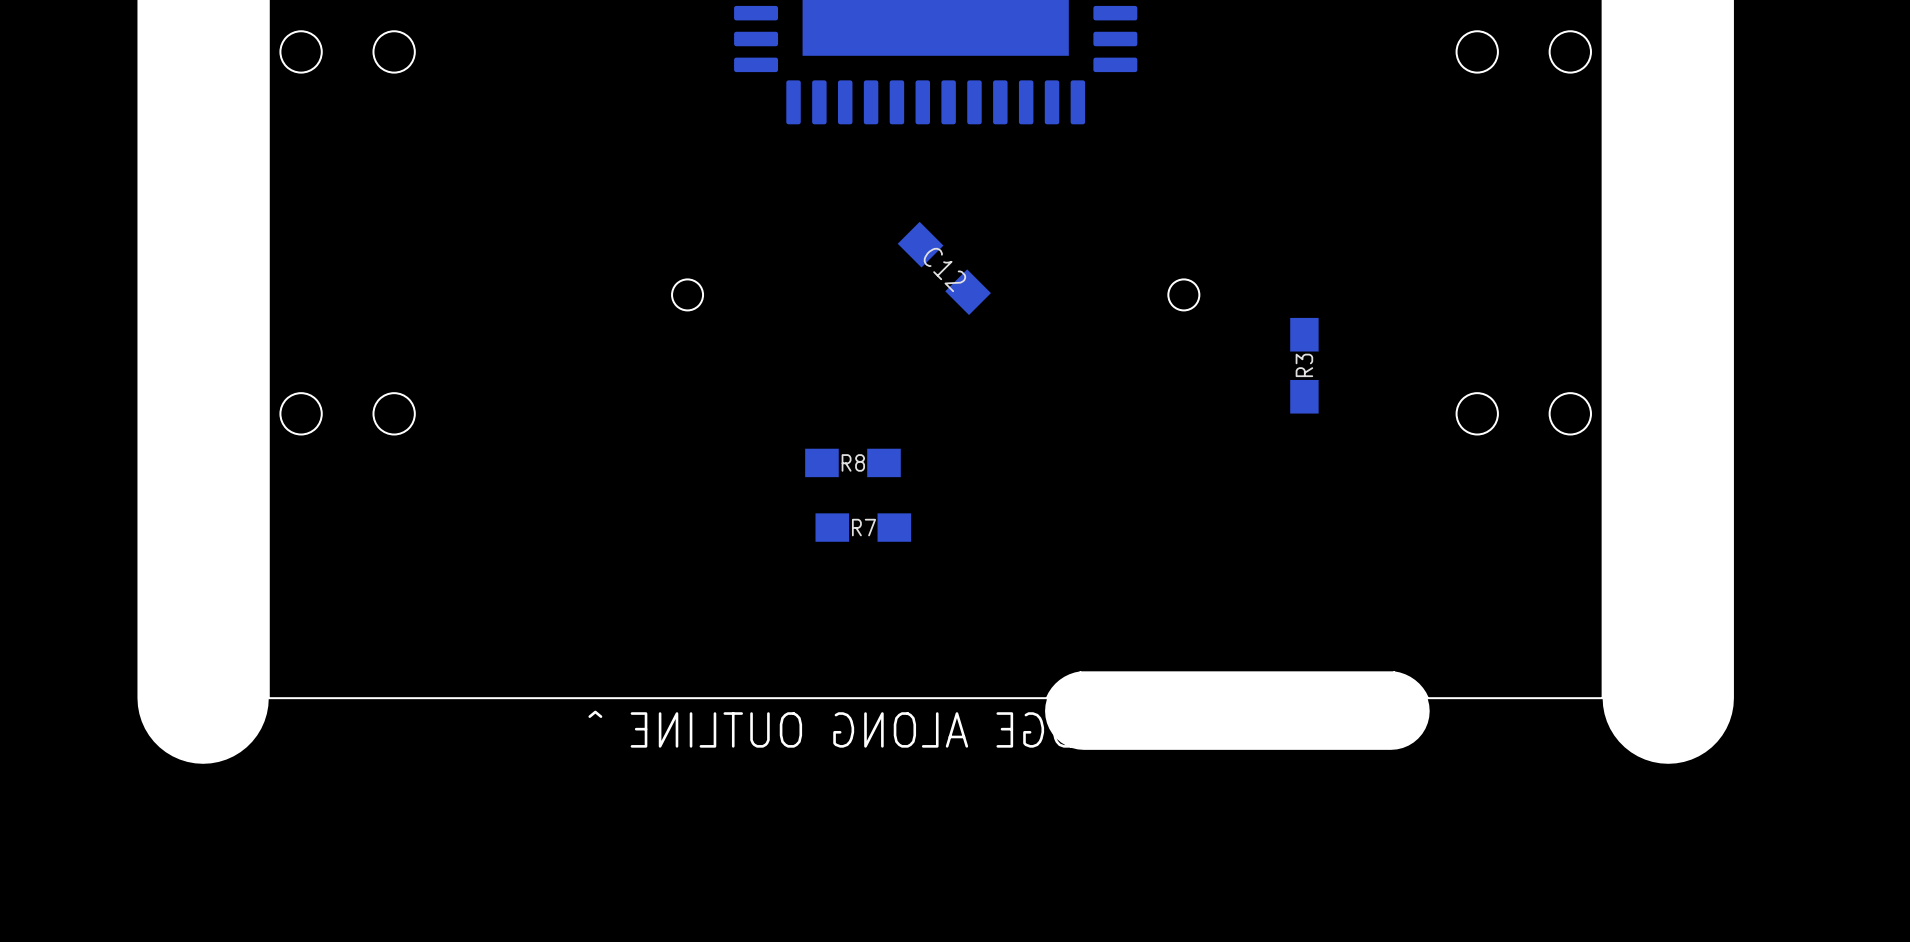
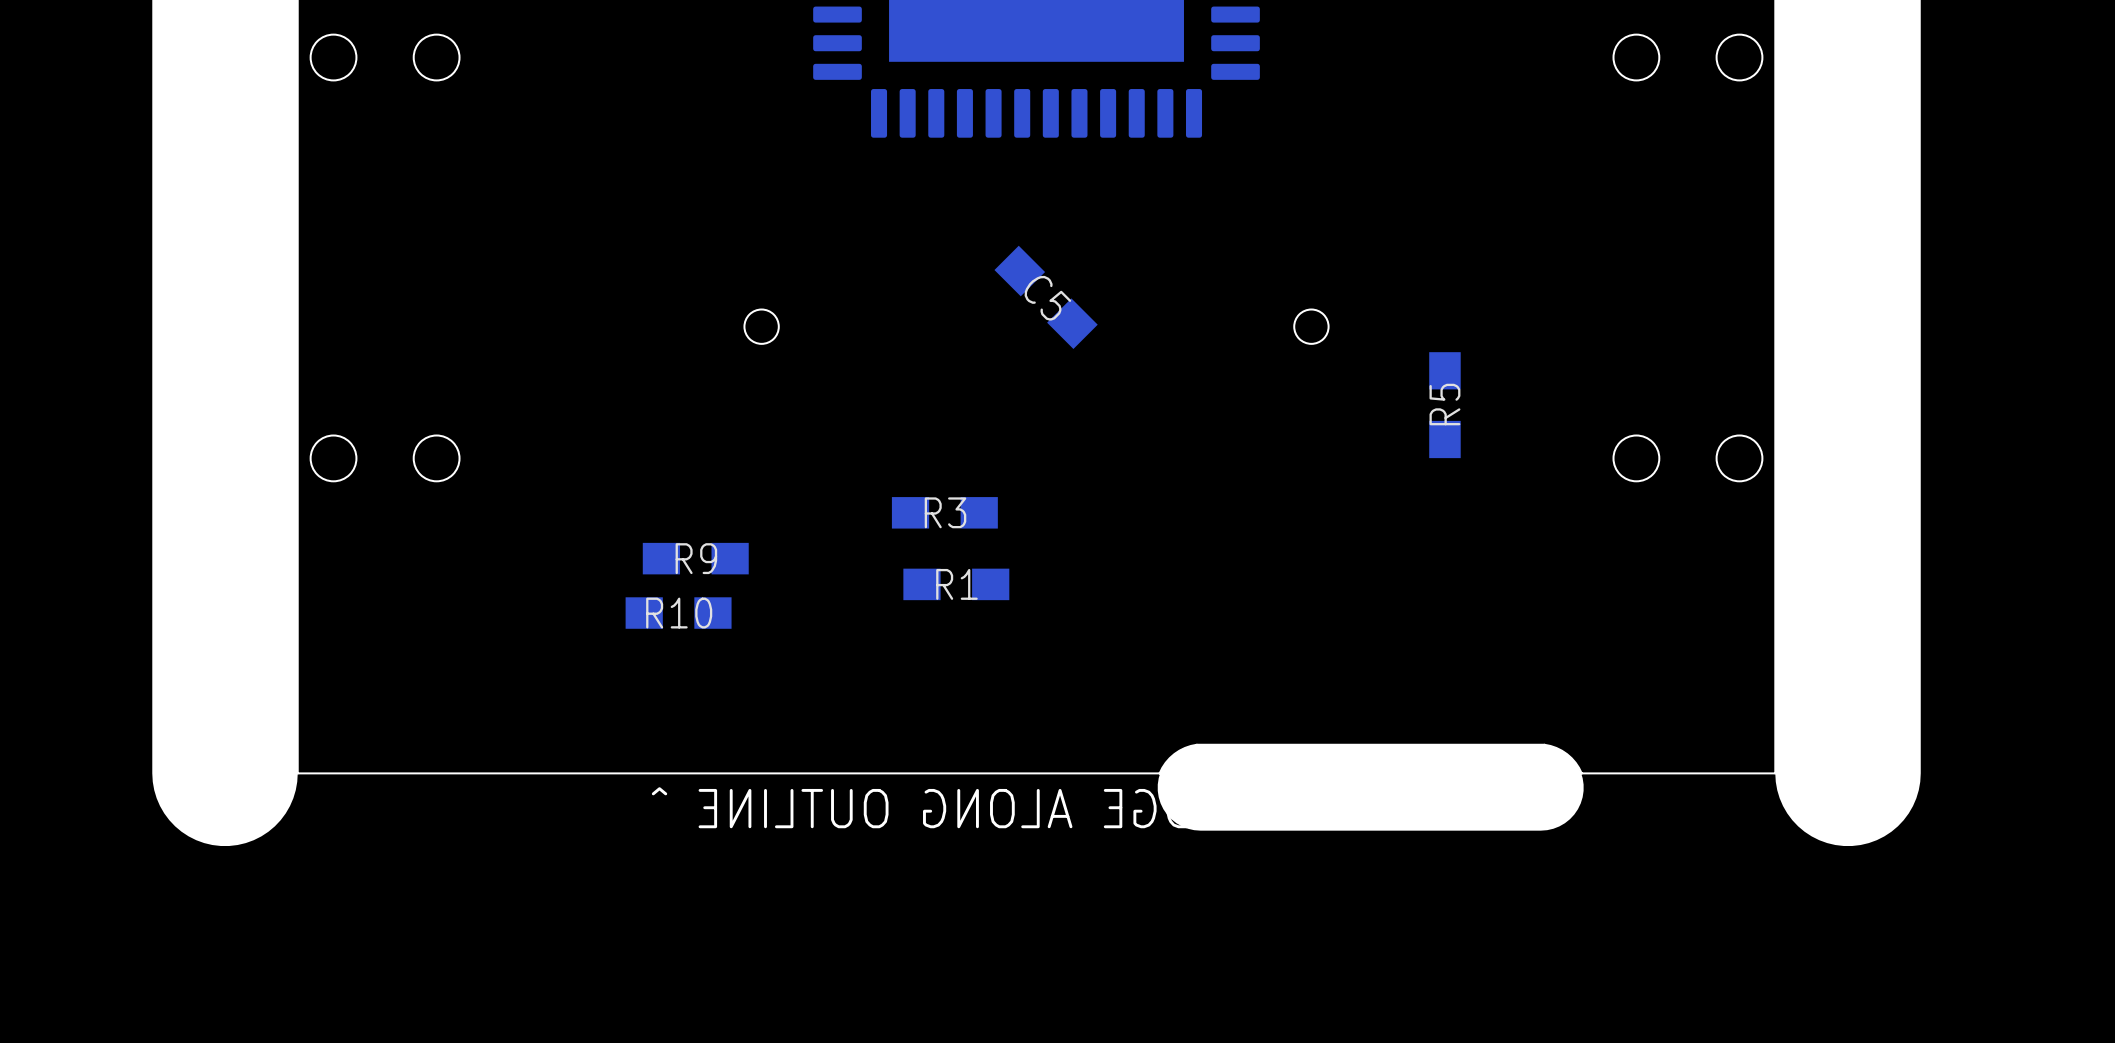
C12 name: C12 (944, 269) -> C5 (1047, 298)
R3 name: R3 (1304, 365) -> R5 (1444, 404)
R8 name: R8 (853, 462) -> R3 (945, 512)
R9: none -> (695, 558)
R7 name: R7 (863, 527) -> R1 (956, 584)
R10: none -> (678, 613)

